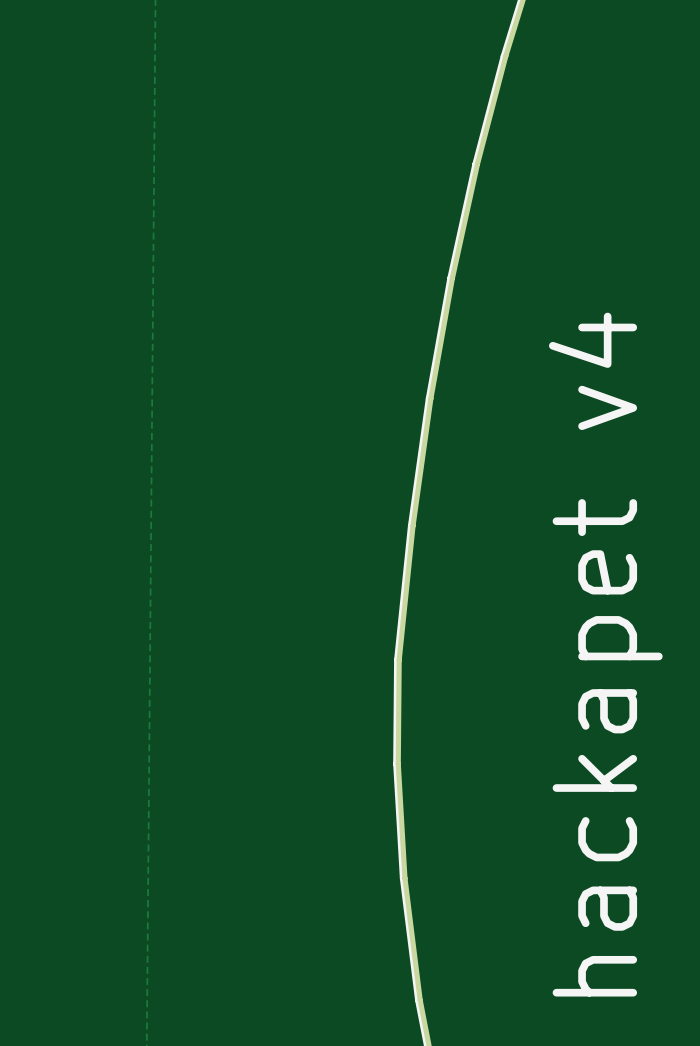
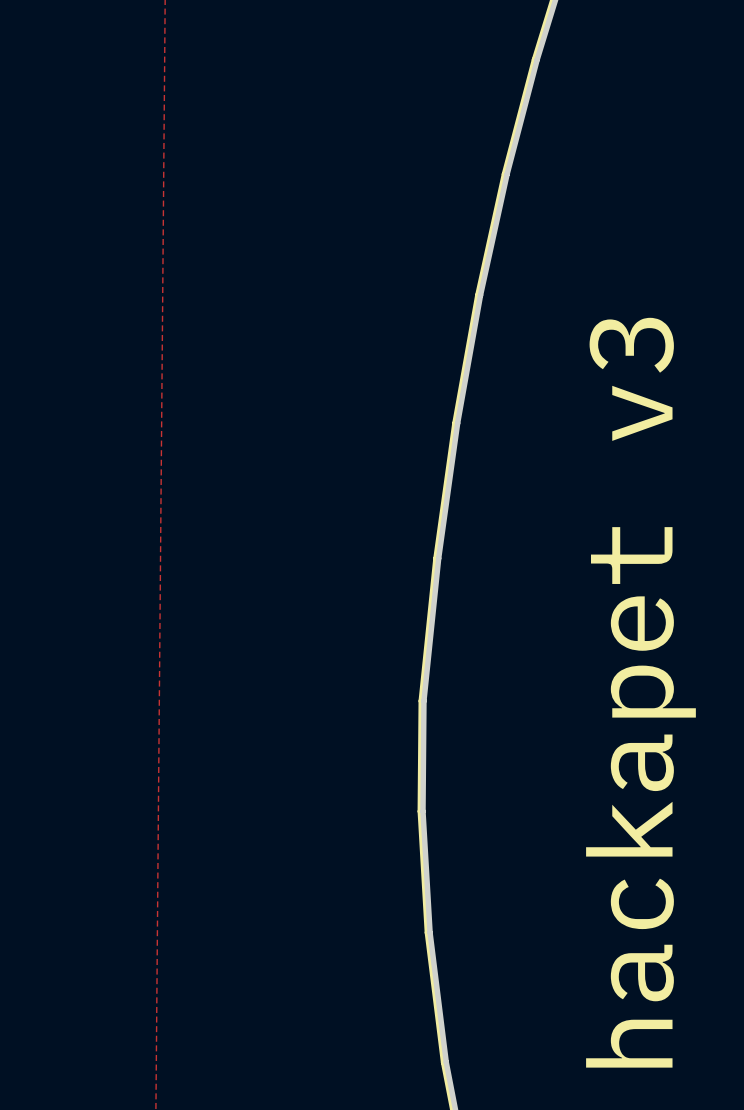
text: hackapet v4 (605, 654) -> hackapet v3 (640, 692)

